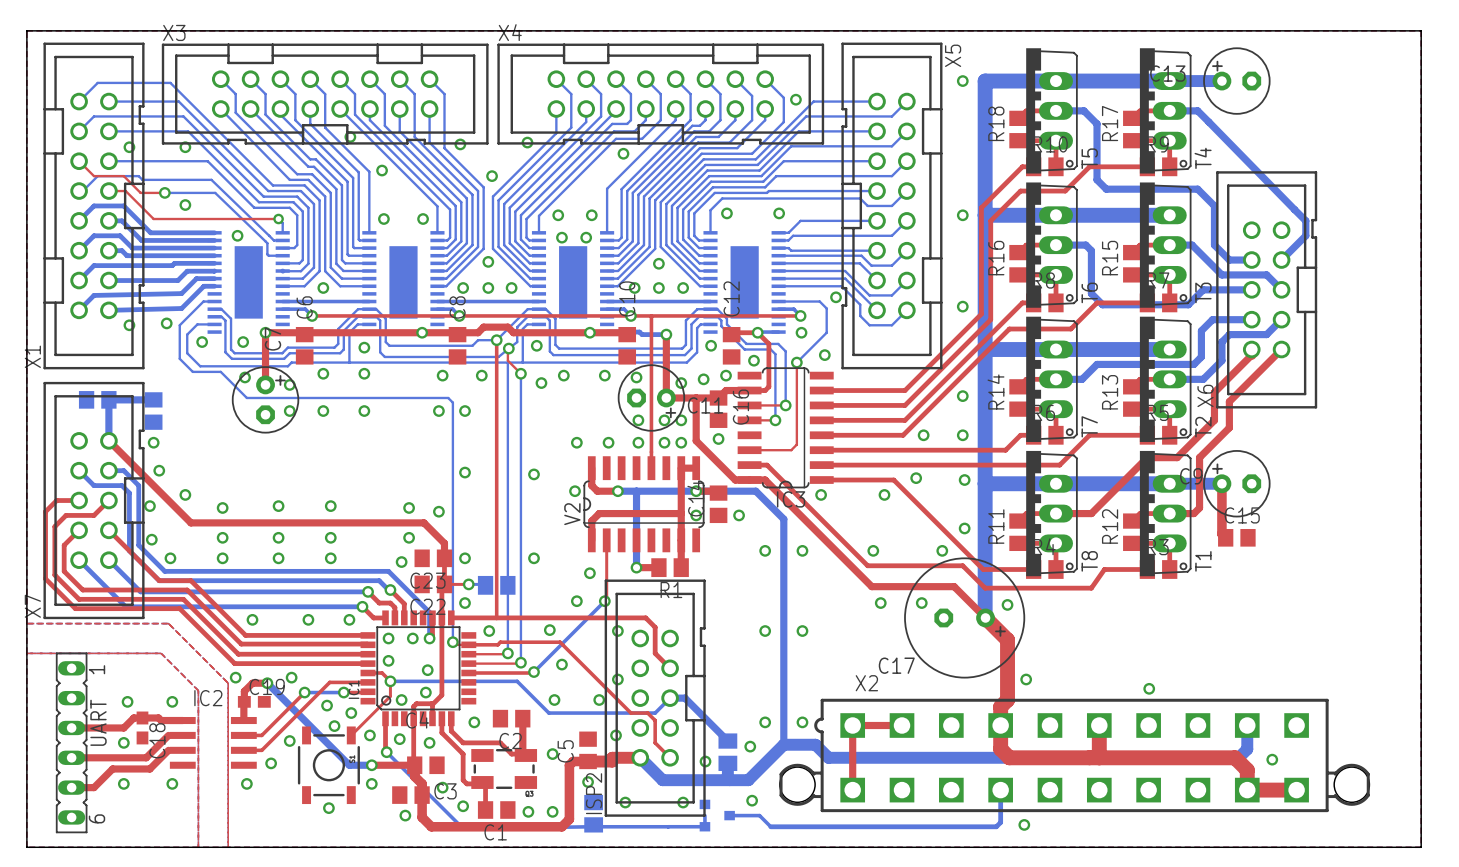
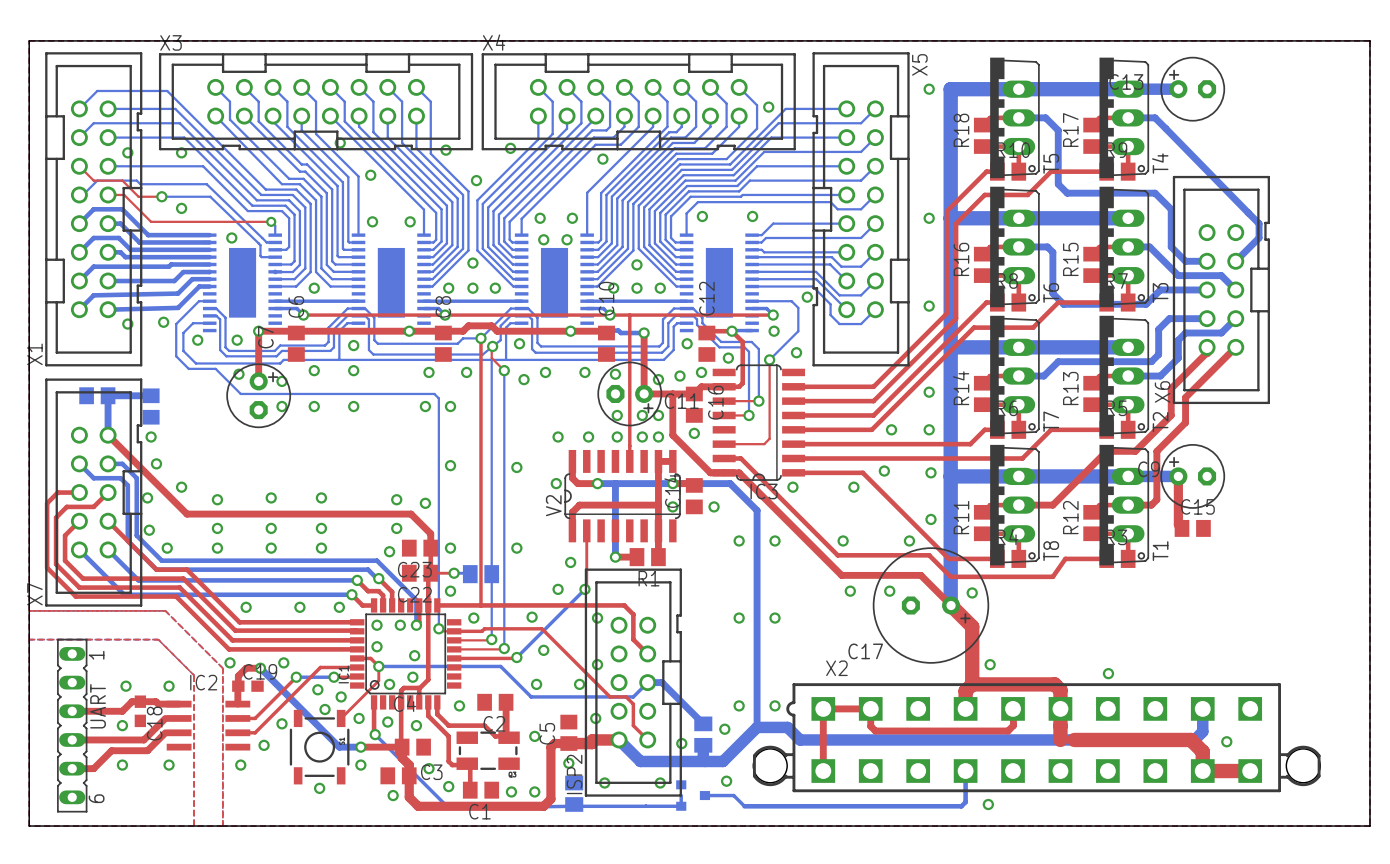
top track: none -> (972, 684) (1054, 684) (1060, 690) (1060, 708)
top track: none -> (870, 708) (870, 726) (875, 731) (1008, 731) (1013, 725) (1013, 708)
top track: (1000, 725) (1000, 749) (1009, 757) (1113, 757) -> none

